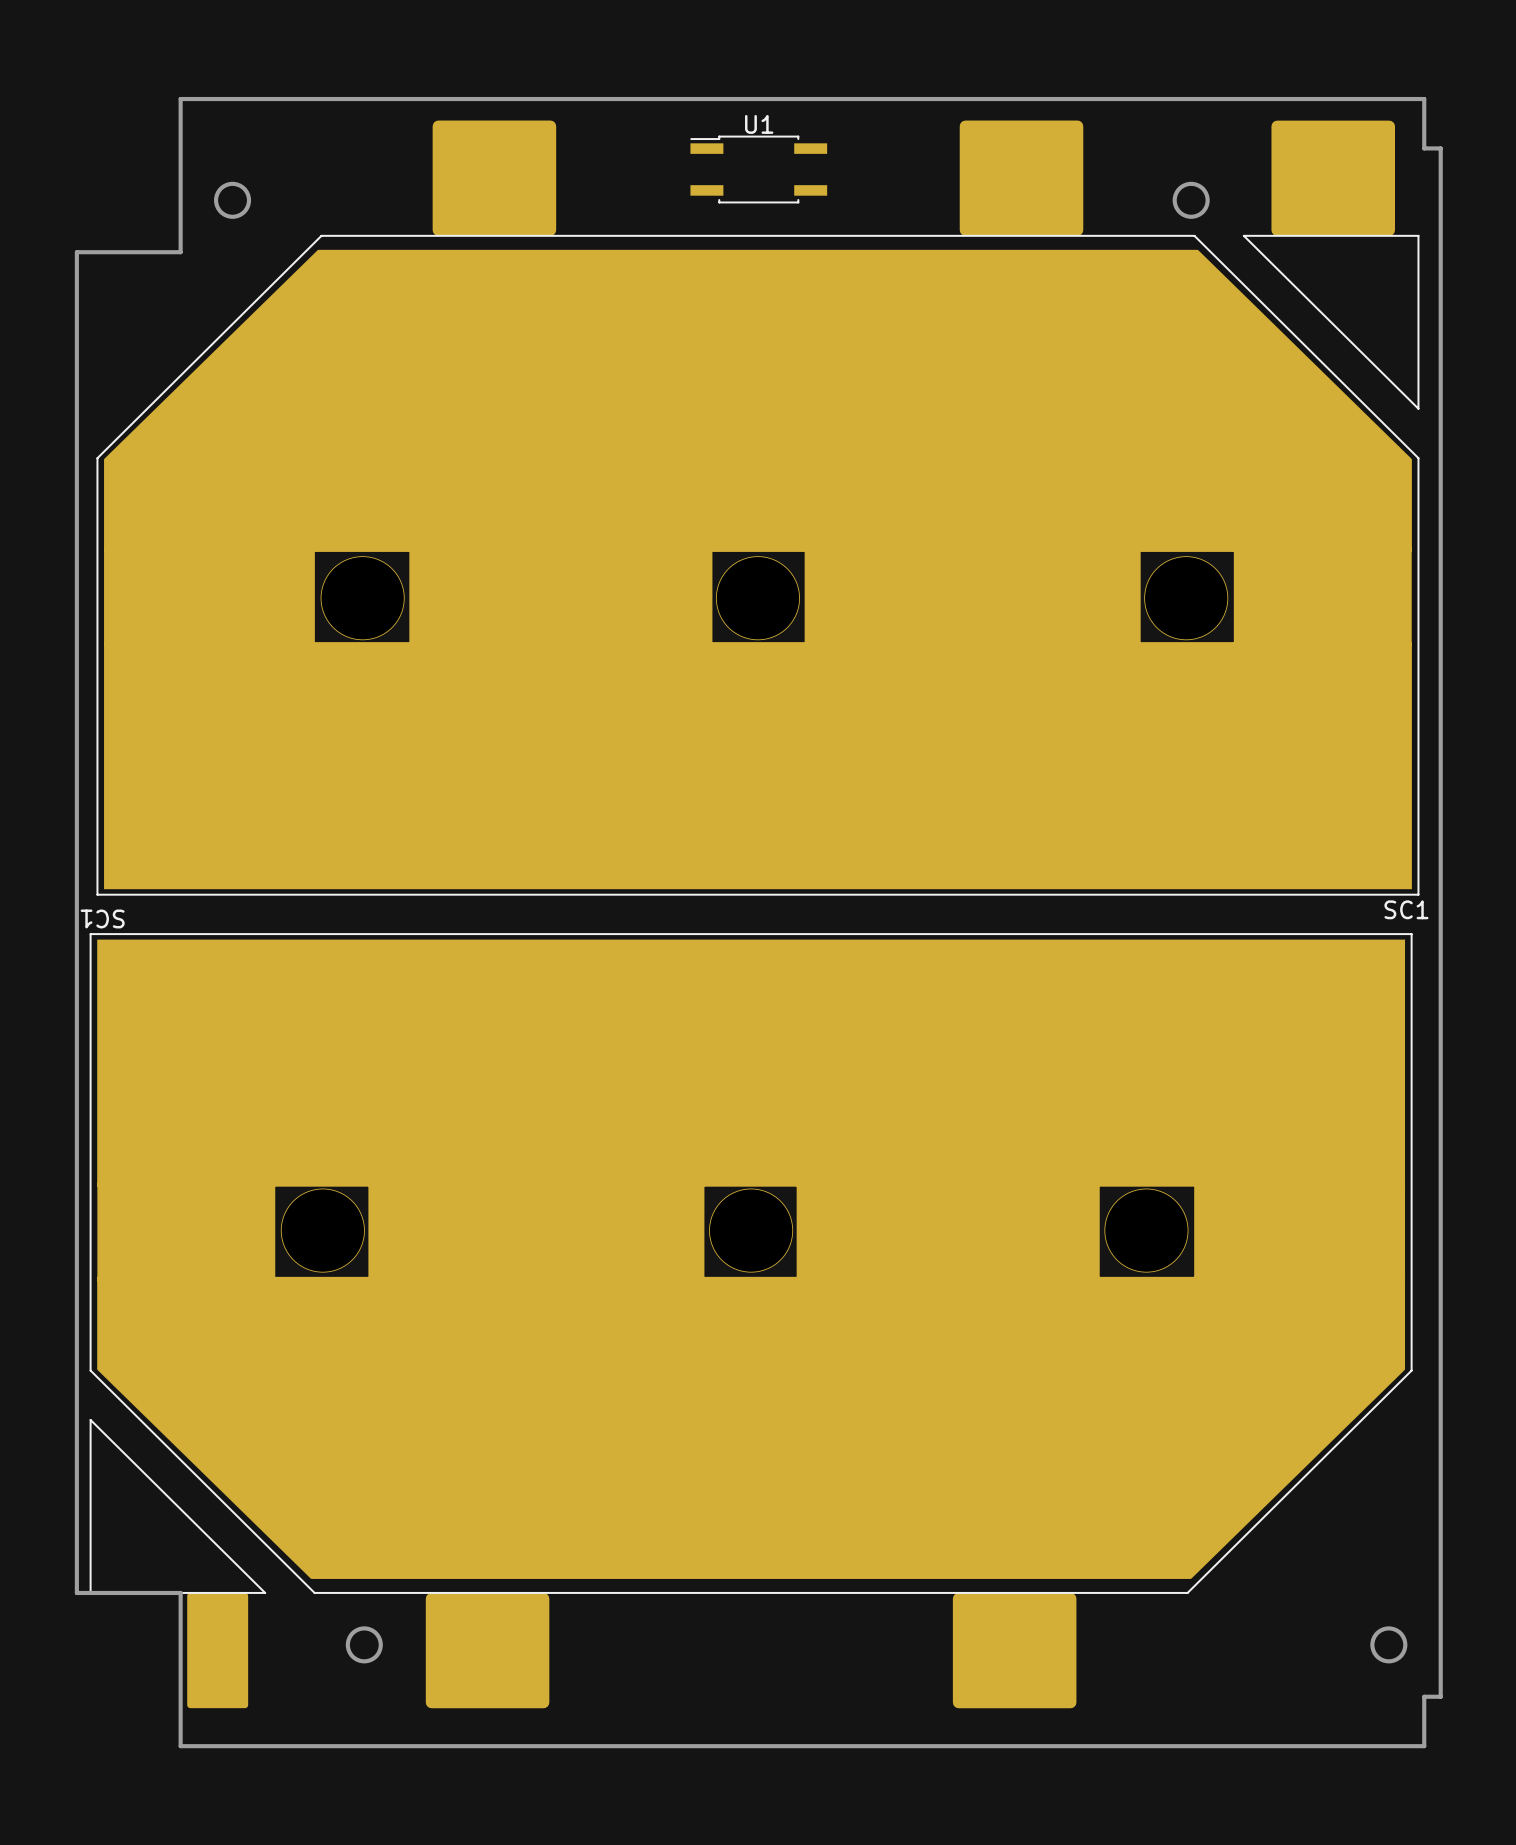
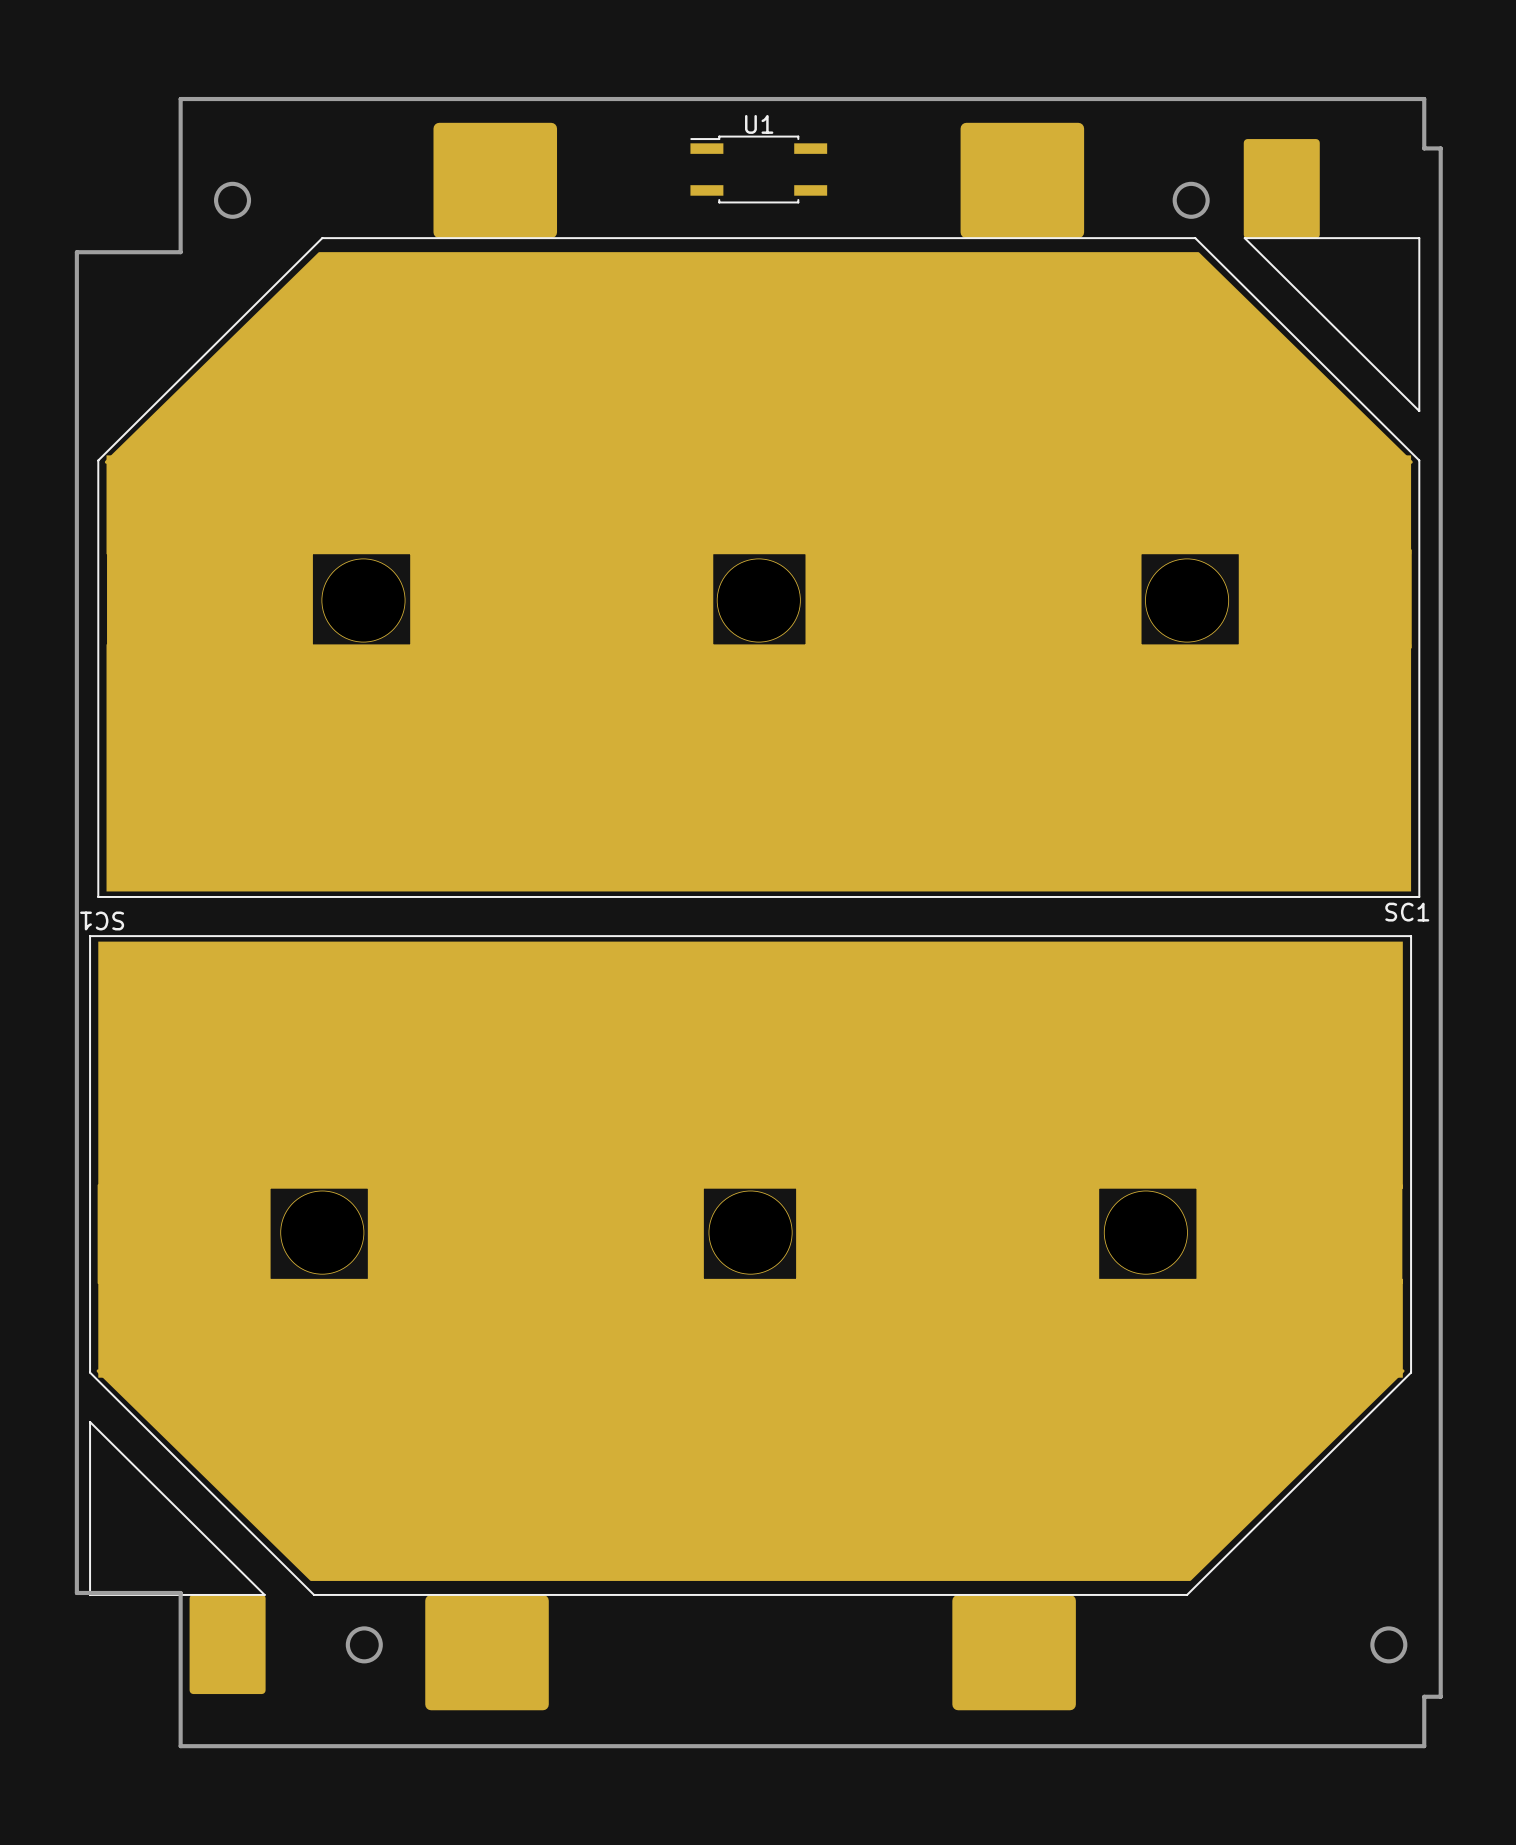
SC1 footprint: [96, 120, 1420, 896] -> [97, 122, 1421, 898]
SC1 footprint: [89, 933, 1413, 1709] -> [89, 935, 1413, 1711]

